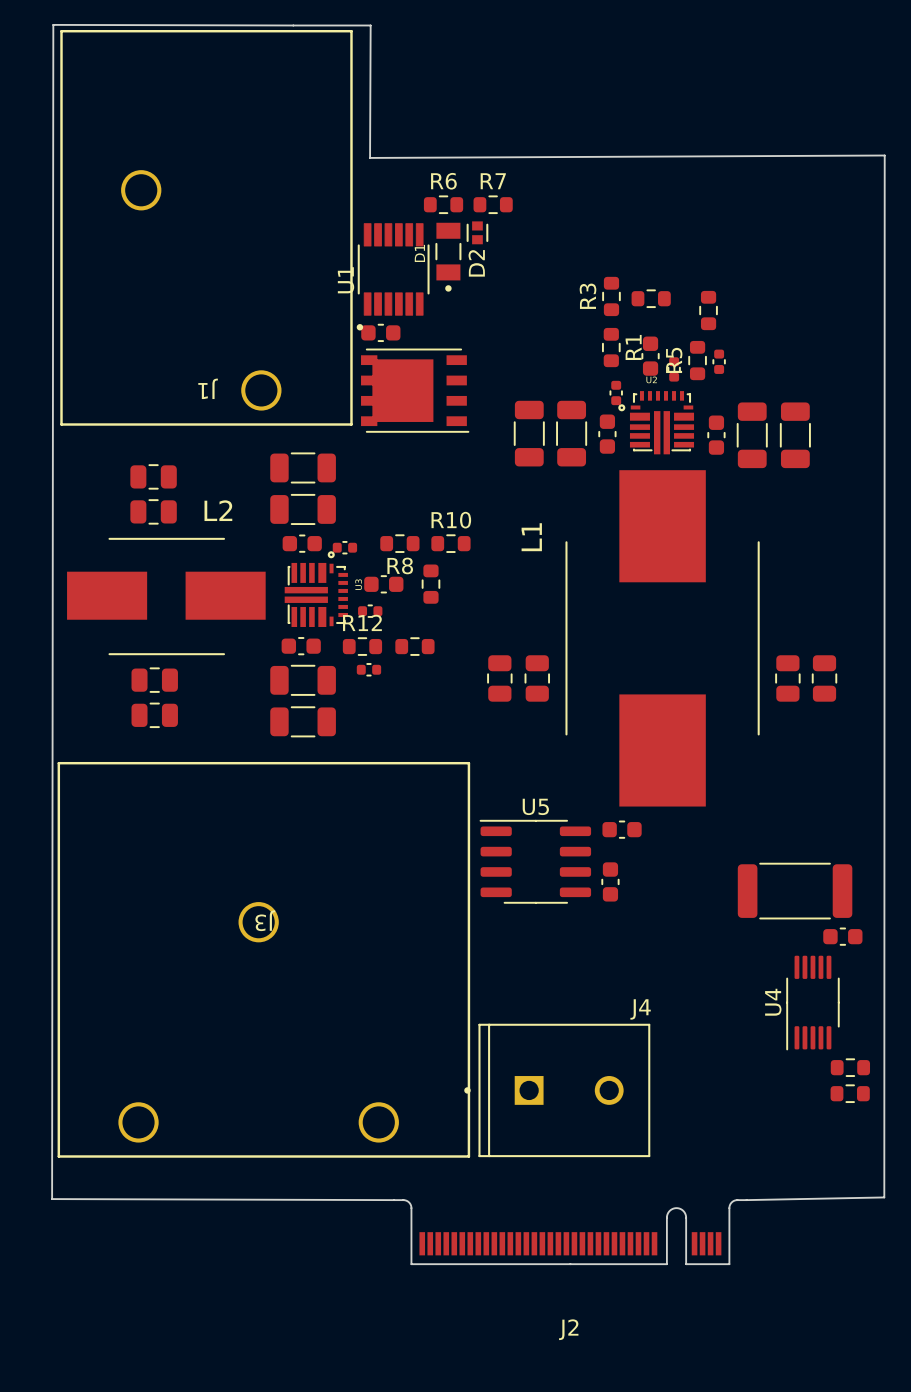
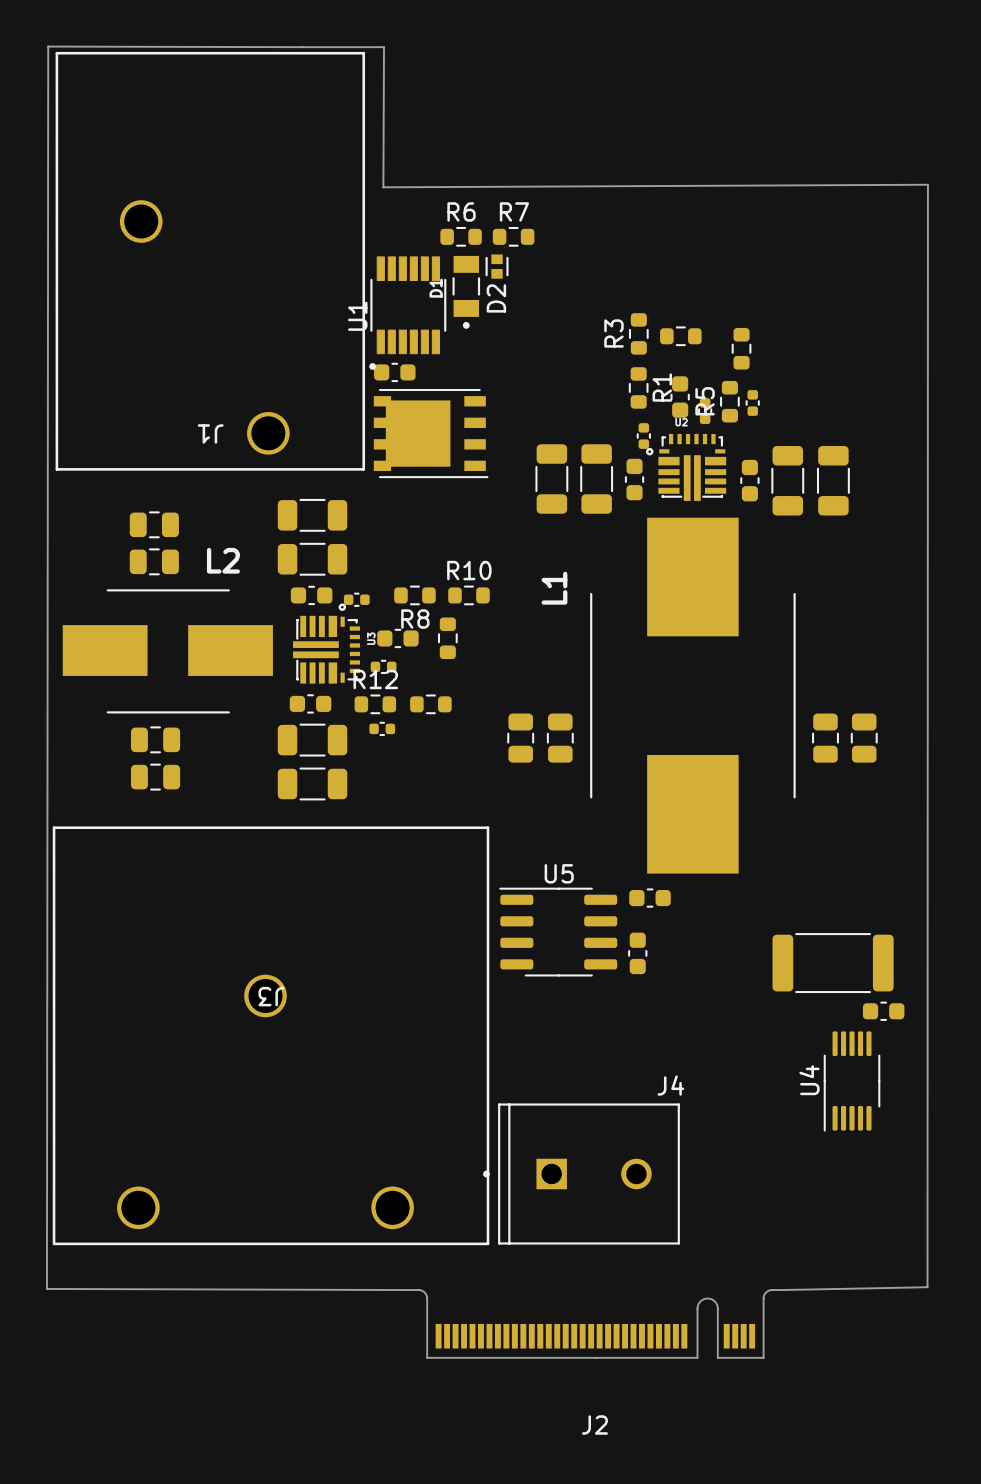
part: (850, 1067) -> none
part: (850, 1093) -> none

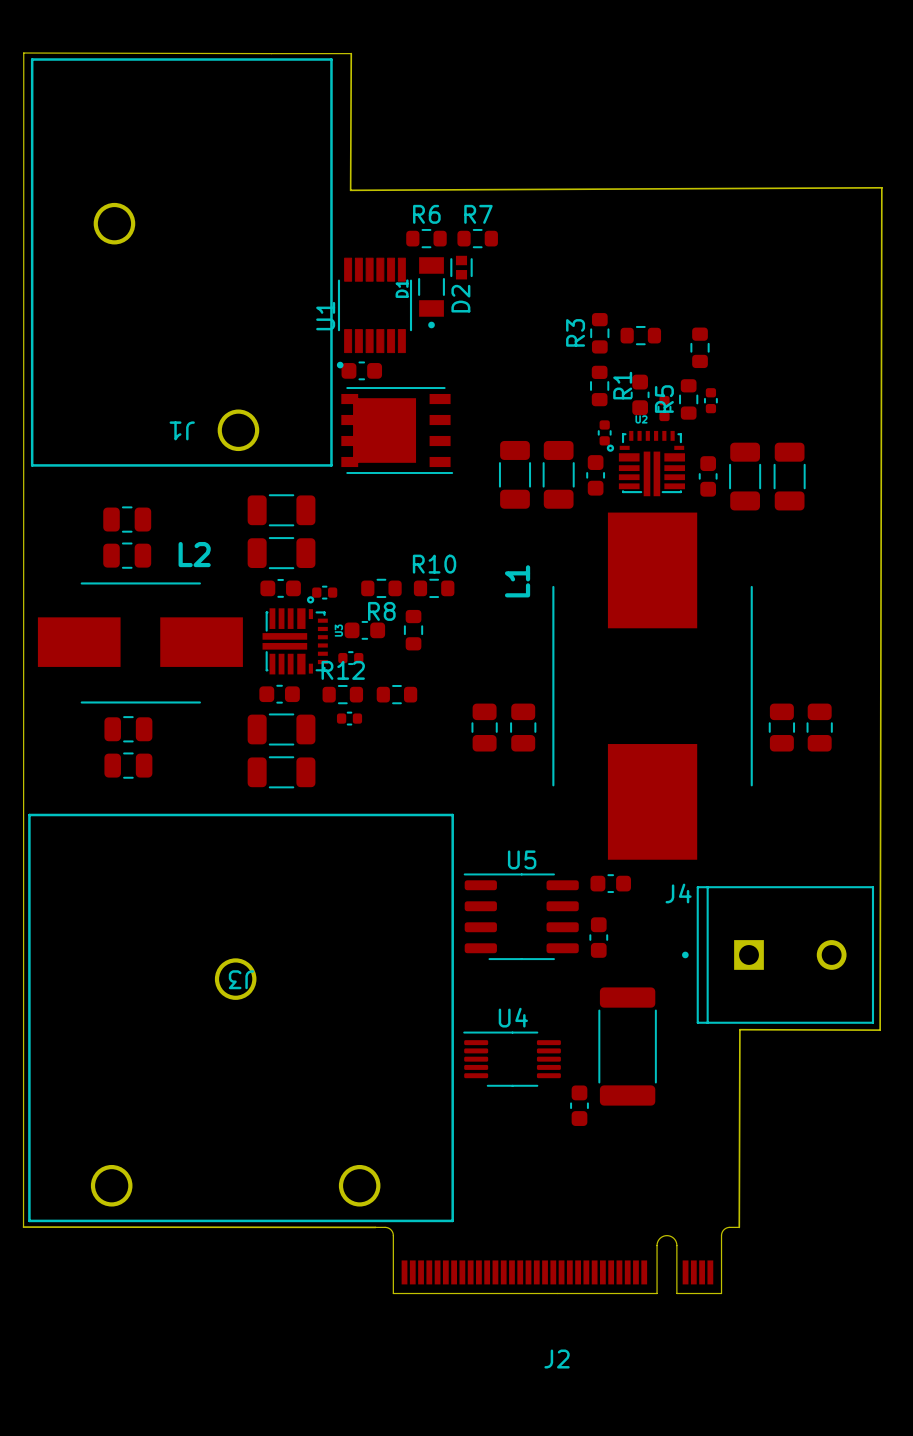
board edge: (48, 46) (46, 1288) (408, 1290) -> (23, 53) (23, 1227) (375, 1227)
board edge: (927, 184) (927, 1287) (781, 1290) -> (881, 187) (880, 1030) (739, 1029) (739, 1227)
part rotation: 0° (833, 963) -> 90° clockwise (627, 1046)
part position: (833, 963) -> (627, 1046)
part rotation: 0° (883, 1011) -> 90° clockwise (579, 1105)
part position: (883, 1011) -> (579, 1105)
U4 rotation: 0° (852, 1081) -> 90° clockwise (512, 1059)
U4 position: (852, 1081) -> (512, 1059)
J4 name position: J4 (670, 1085) -> J4 (678, 893)
J4 position: (581, 1174) -> (778, 954)
J2 position: (595, 1323) -> (557, 1260)

